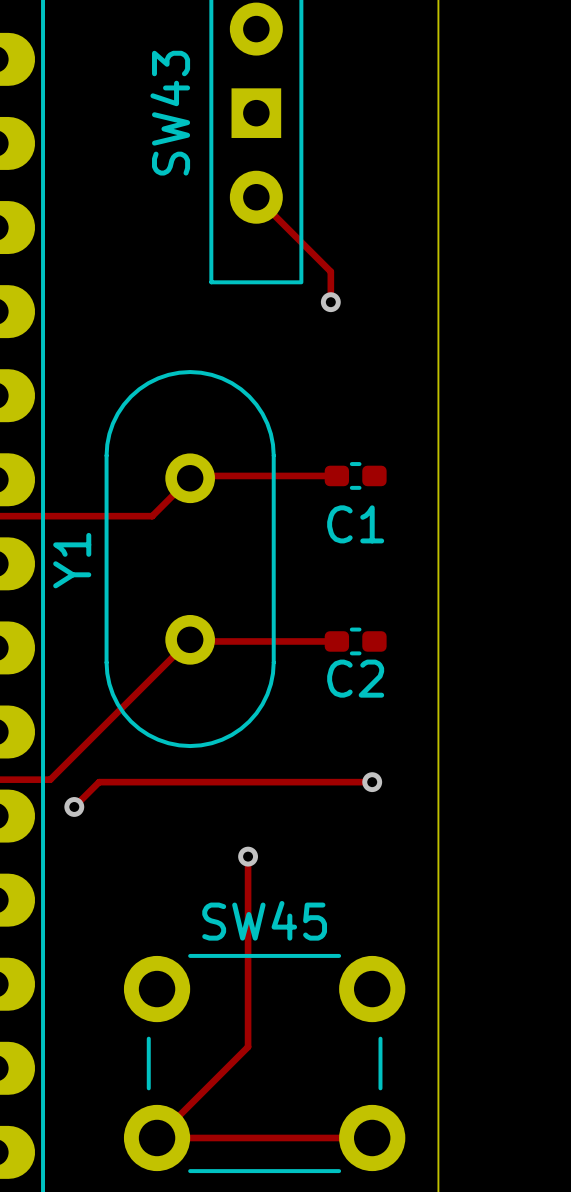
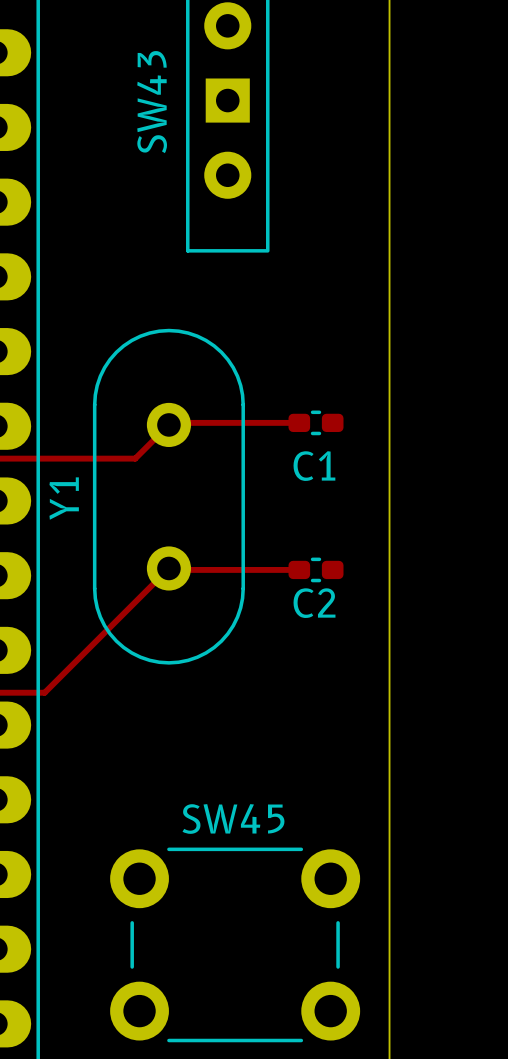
track: (256, 197) (330, 271) (330, 302) -> none
via: (330, 302) -> none
track: (372, 782) (99, 782) (74, 806) -> none
via: (372, 782) -> none
via: (74, 806) -> none
track: (248, 856) (248, 1046) (157, 1137) (372, 1137) -> none
via: (248, 856) -> none

